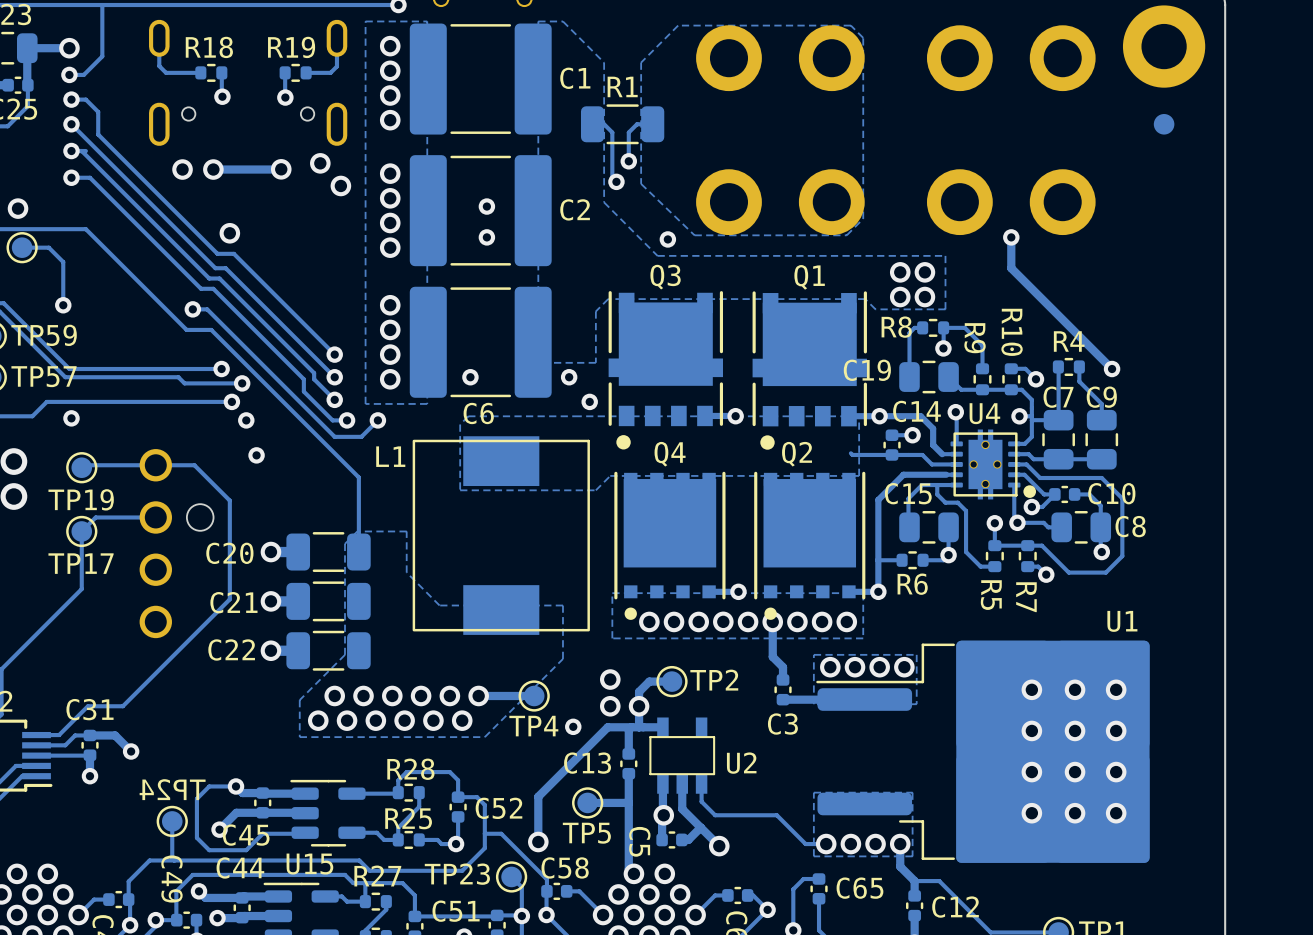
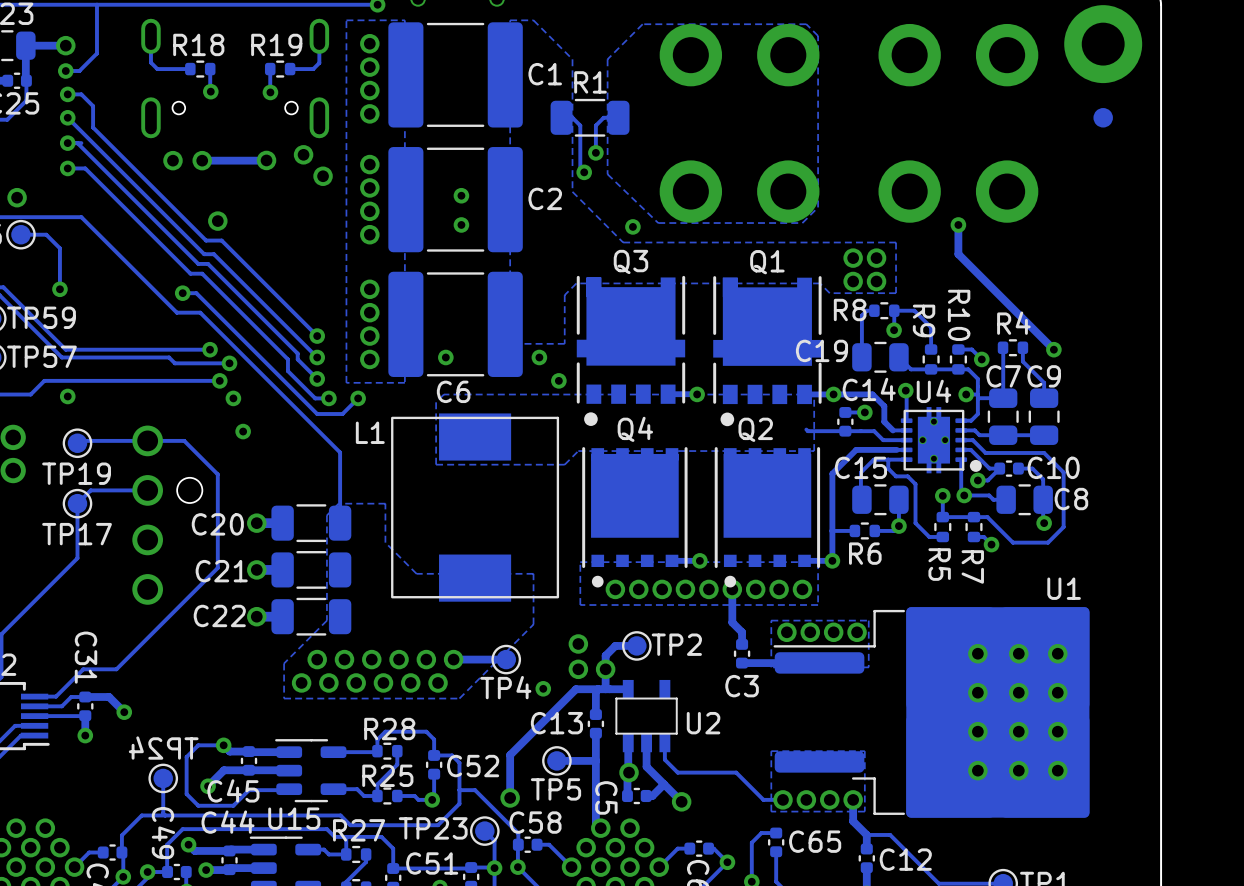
Q3 footprint: [608, 291, 724, 450] -> [576, 275, 686, 426]
Q1 footprint: [752, 291, 867, 450] -> [713, 276, 822, 427]
C31 name rotation: 0° (89, 709) -> 90° clockwise (86, 657)

